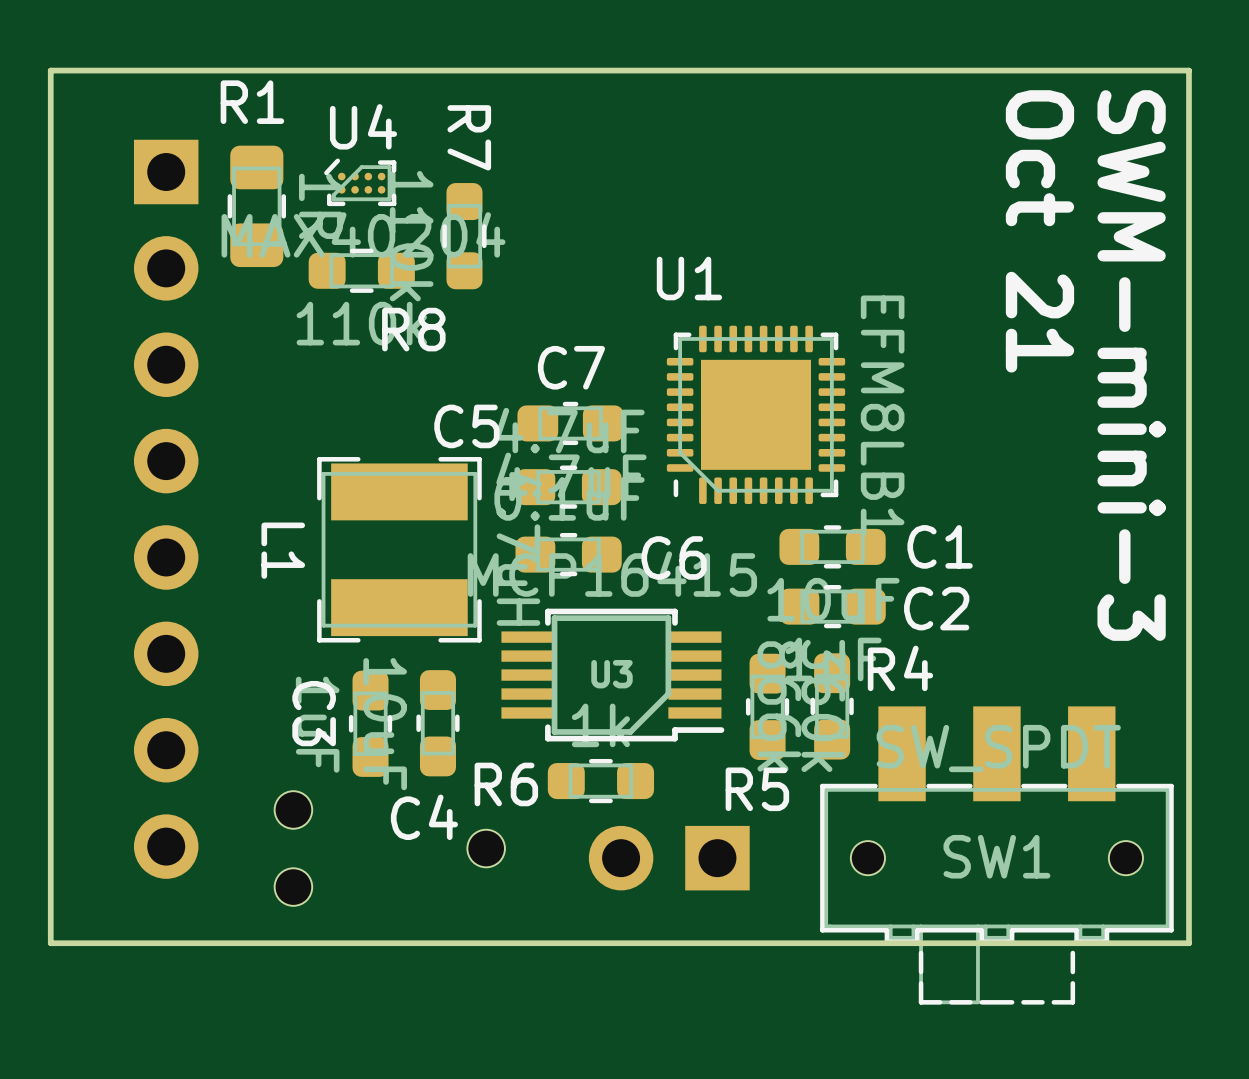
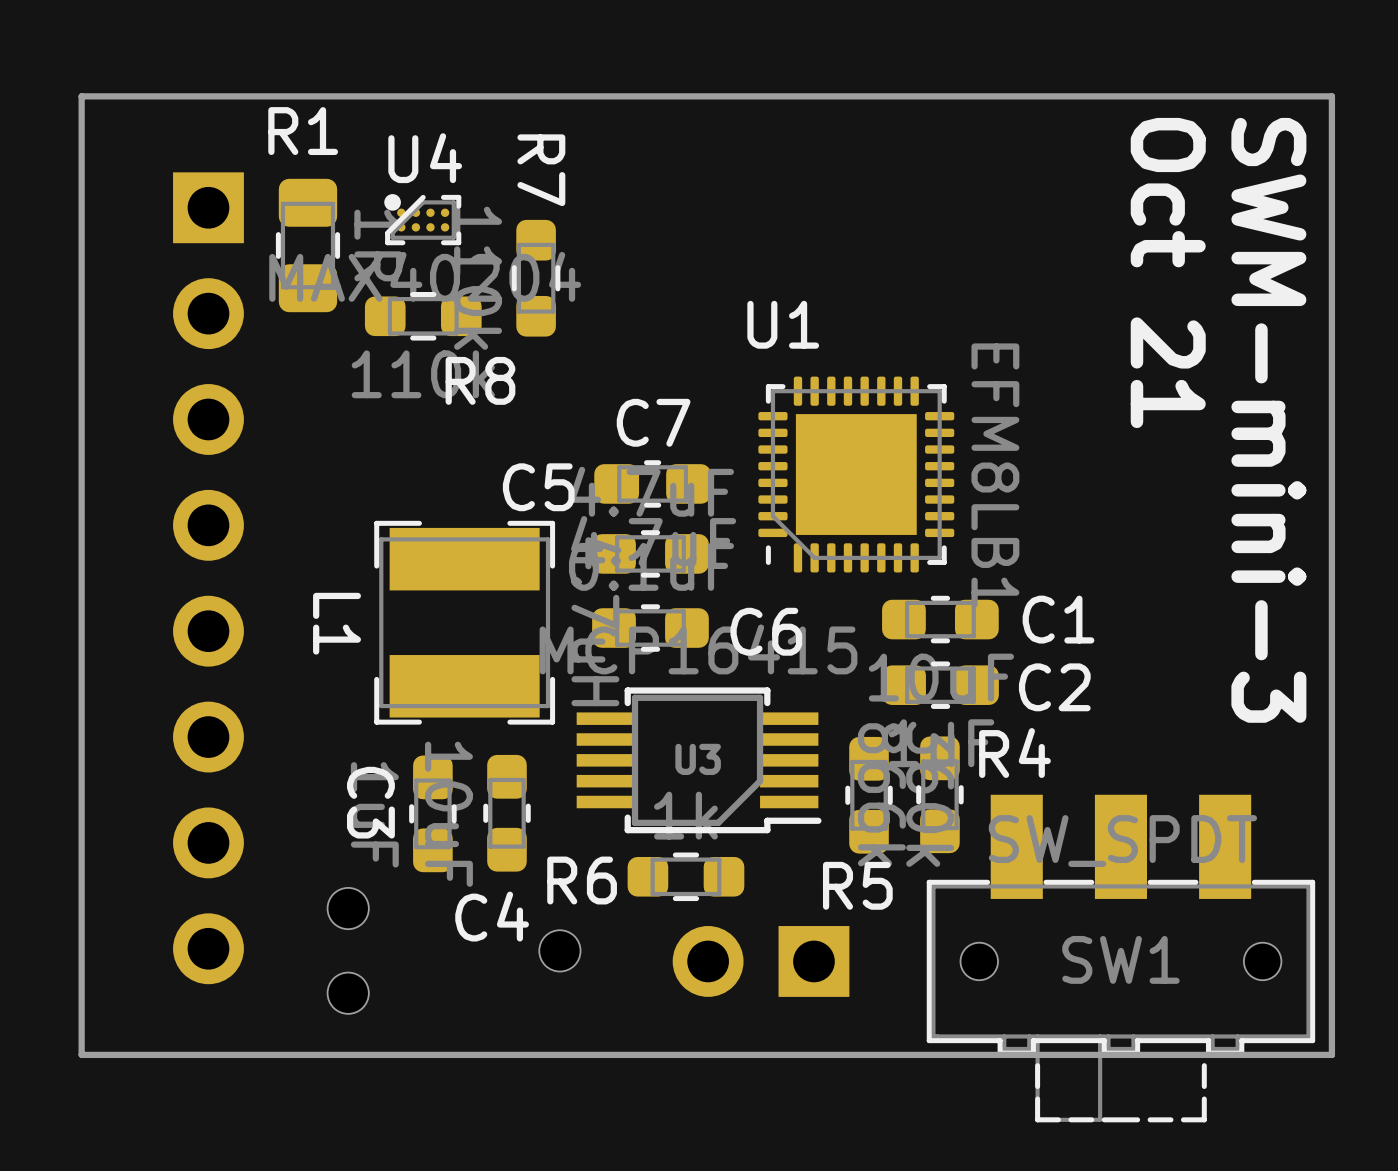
U4 footprint: [324, 158, 397, 207] -> [384, 194, 462, 246]

